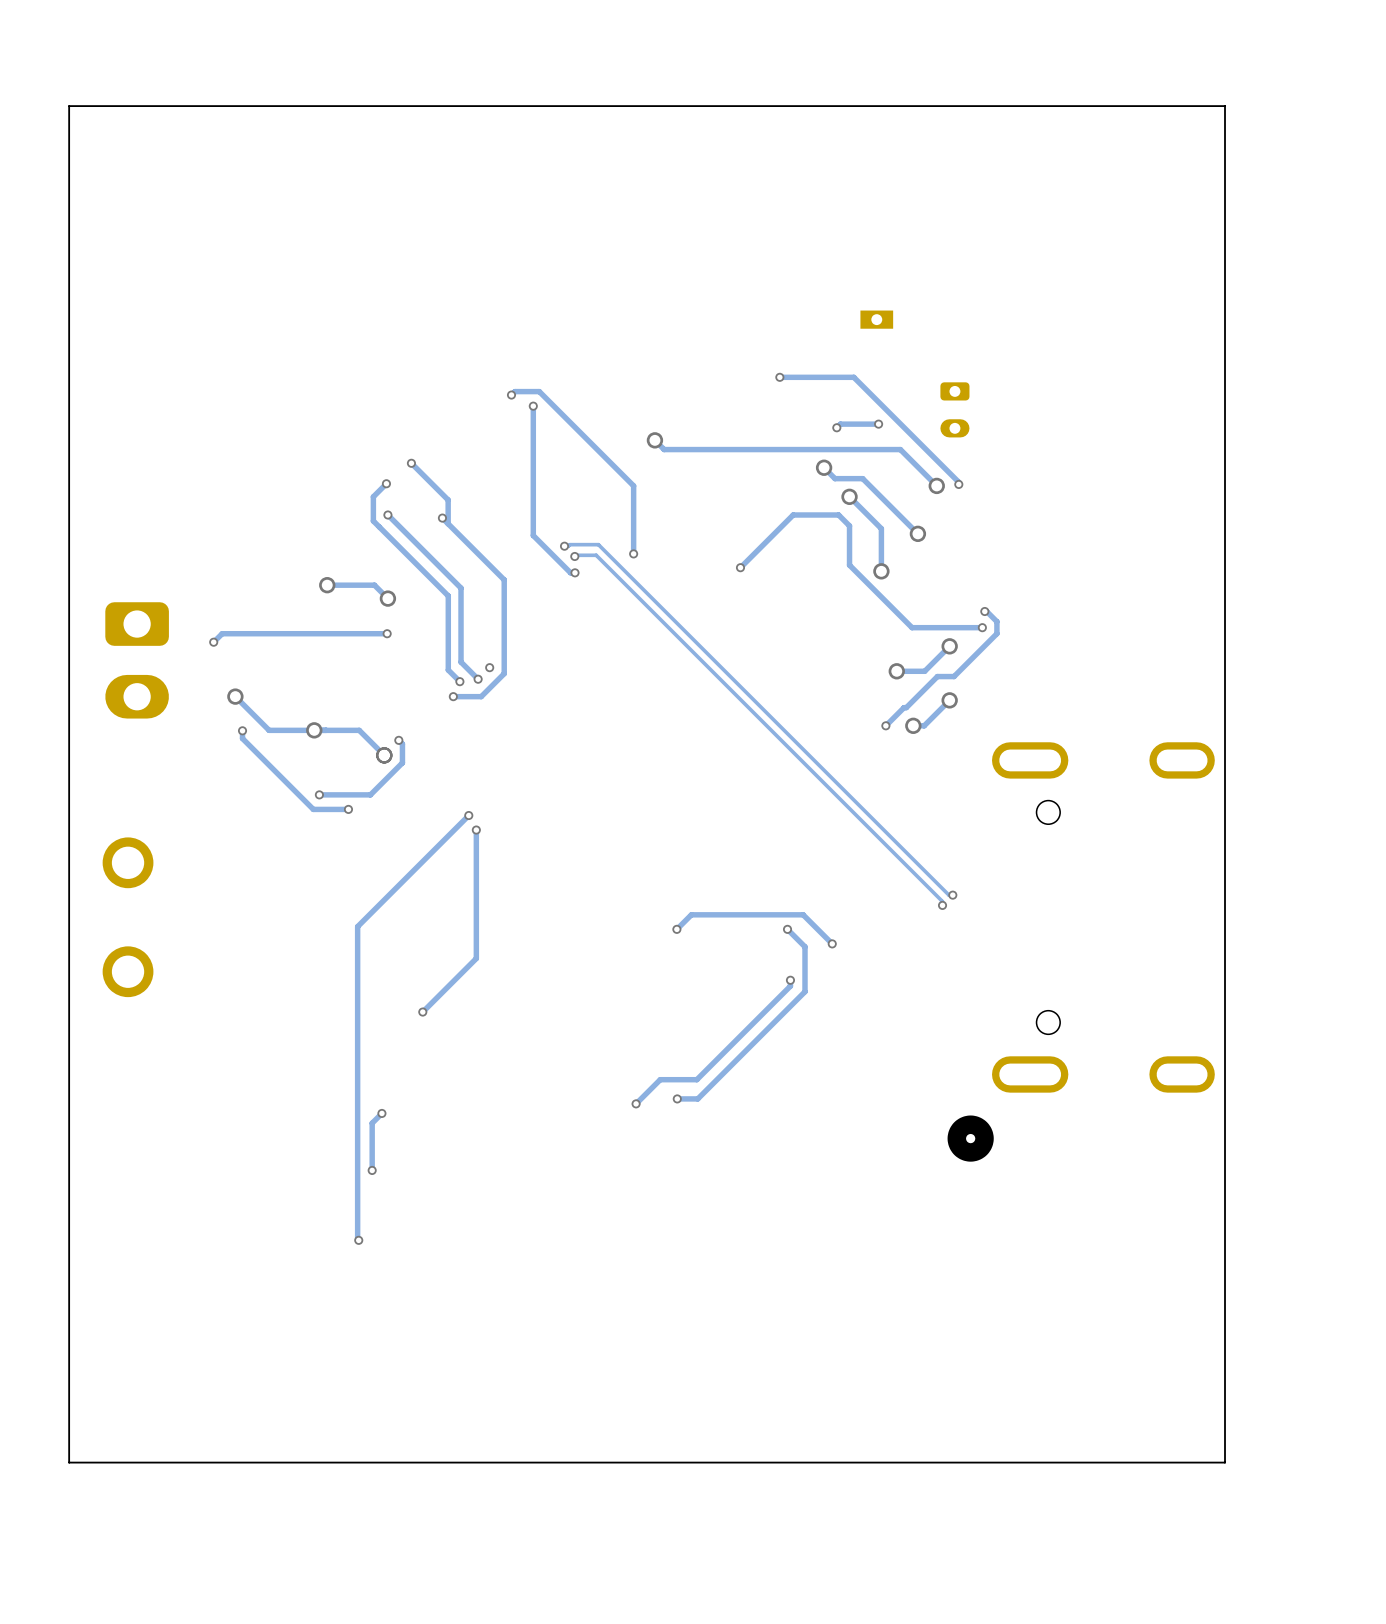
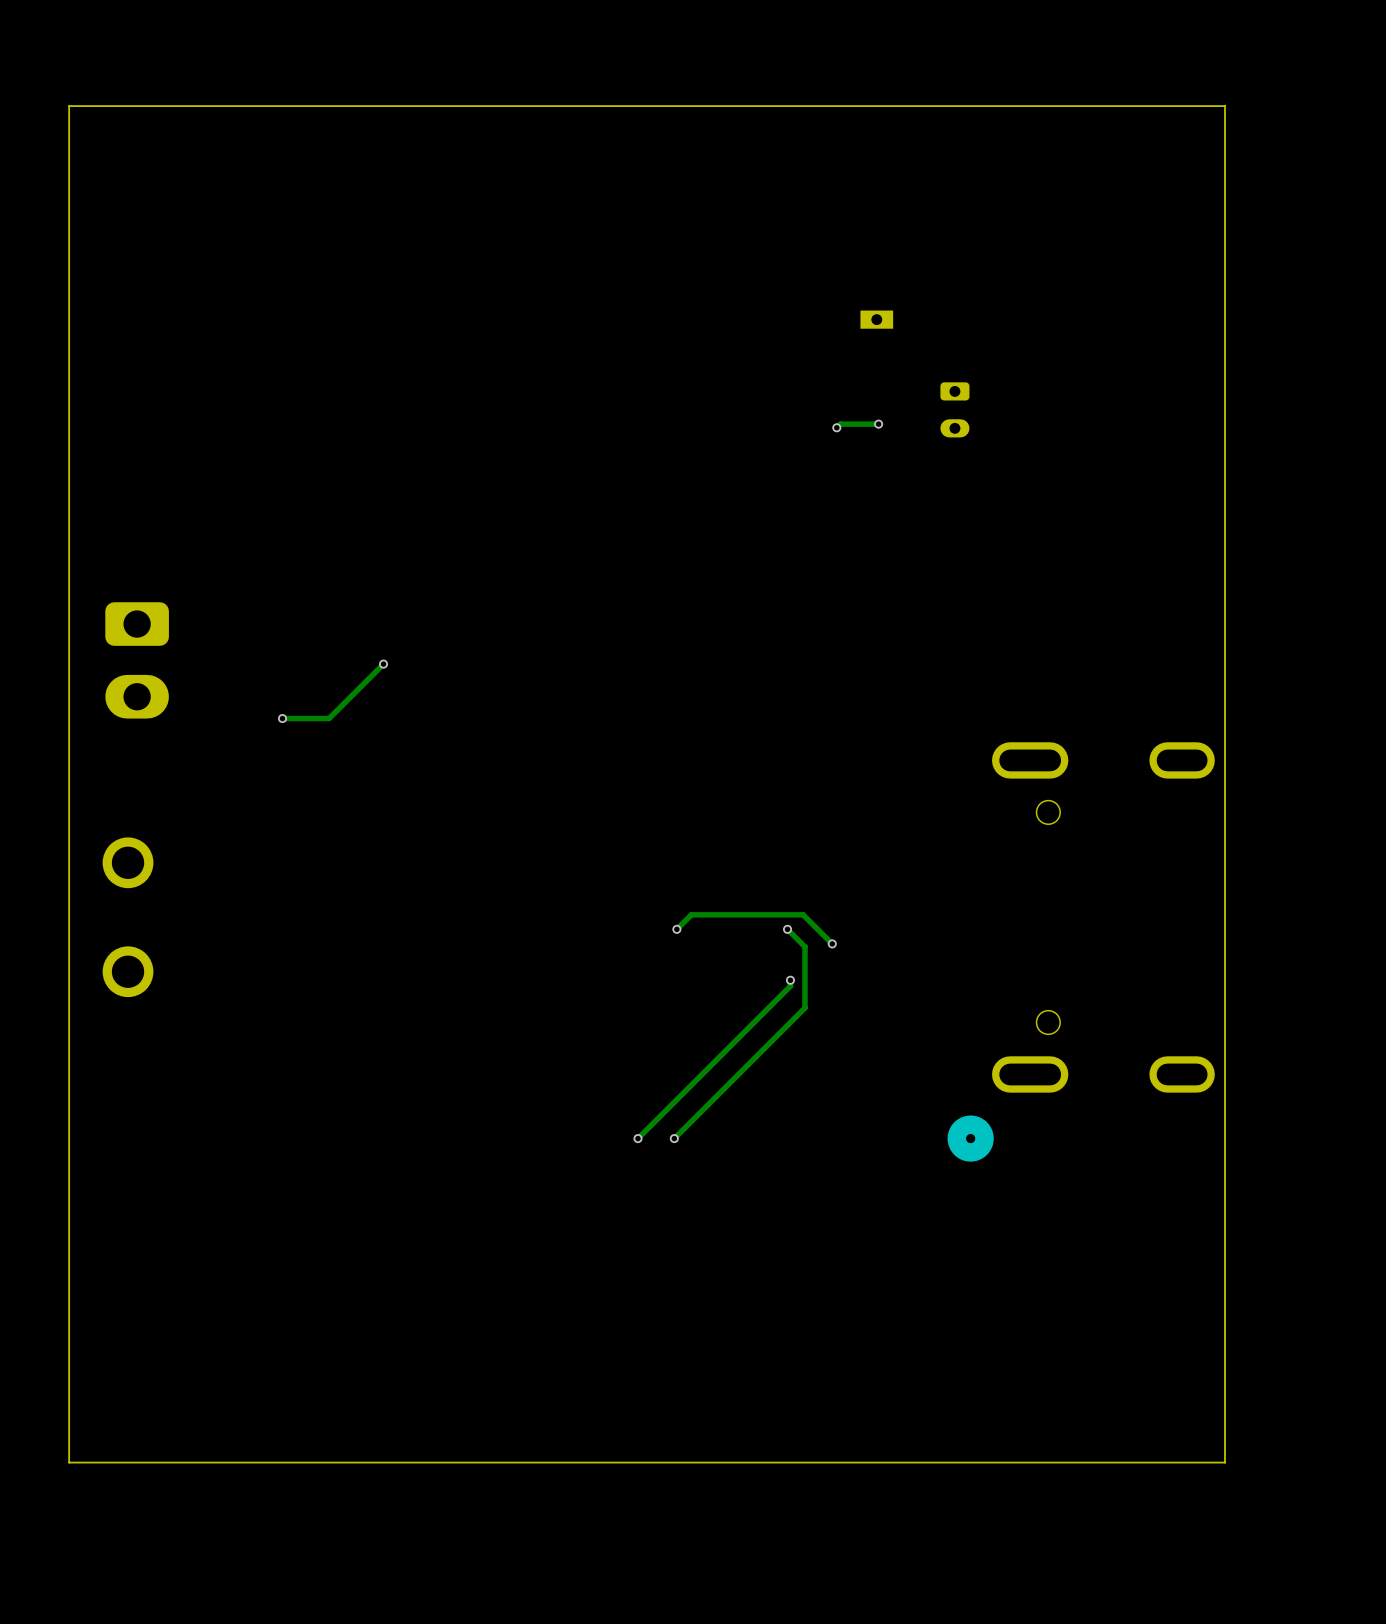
track: (779, 377) (853, 377) (958, 482) (958, 484) -> none
via: (779, 377) -> none
track: (511, 395) (514, 391) (539, 391) (633, 485) (633, 553) -> none
via: (511, 395) -> none
track: (533, 406) (533, 535) (570, 572) (575, 572) -> none
via: (533, 406) -> none
track: (654, 440) (664, 449) (900, 449) (936, 485) -> none
via: (654, 440) -> none
track: (411, 463) (448, 500) (448, 523) -> none
via: (411, 463) -> none
track: (824, 467) (834, 478) (862, 478) (917, 533) -> none
via: (824, 467) -> none
track: (386, 483) (373, 496) (373, 521) (448, 595) (448, 670) (459, 681) -> none
via: (386, 483) -> none
via: (958, 484) -> none
via: (936, 485) -> none
track: (849, 496) (881, 528) (881, 571) -> none
via: (849, 496) -> none
track: (387, 515) (461, 588) (461, 662) (478, 679) -> none
via: (387, 515) -> none
track: (442, 518) (504, 579) (504, 673) (481, 696) (453, 696) -> none
via: (442, 518) -> none
via: (917, 533) -> none
track: (564, 546) (598, 544) (948, 895) (952, 895) -> none
via: (564, 546) -> none
via: (633, 553) -> none
track: (574, 556) (596, 555) (942, 901) (942, 905) -> none
via: (574, 556) -> none
track: (740, 567) (793, 515) (838, 515) (849, 525) (849, 565) (912, 627) (982, 627) -> none
via: (740, 567) -> none
via: (881, 571) -> none
via: (575, 572) -> none
track: (327, 585) (374, 585) (387, 598) -> none
via: (327, 585) -> none
via: (387, 598) -> none
track: (984, 611) (996, 621) (996, 633) (954, 676) (937, 676) (885, 725) -> none
via: (984, 611) -> none
via: (982, 627) -> none
track: (387, 633) (222, 633) (213, 642) -> none
via position: (387, 633) -> (383, 664)
via: (213, 642) -> none
track: (949, 646) (924, 671) (896, 671) -> none
via: (949, 646) -> none
track: none -> (383, 664) (329, 718) (282, 718)
via: (489, 667) -> none
via: (896, 671) -> none
via: (478, 679) -> none
via: (459, 681) -> none
track: (235, 696) (269, 730) (359, 730) (384, 755) -> none
via: (235, 696) -> none
via: (453, 696) -> none
track: (949, 700) (924, 725) (913, 725) -> none
via: (949, 700) -> none
via: (885, 725) -> none
via: (913, 725) -> none
track: (242, 730) (242, 738) (313, 809) (348, 809) -> none
via position: (242, 730) -> (282, 718)
via: (314, 730) -> none
track: (398, 740) (402, 743) (402, 762) (370, 794) (319, 794) -> none
via: (398, 740) -> none
via: (384, 755) -> none
via: (319, 794) -> none
via: (348, 809) -> none
track: (468, 815) (357, 926) (358, 1240) -> none
via: (468, 815) -> none
track: (476, 830) (476, 958) (422, 1012) -> none
via: (476, 830) -> none
via: (952, 895) -> none
via: (942, 905) -> none
track: (805, 991) (697, 1098) (677, 1098) -> (805, 991) (805, 1007) (674, 1138)
via: (422, 1012) -> none
track: (696, 1079) (660, 1079) (636, 1103) -> (696, 1079) (637, 1138)
via: (677, 1098) -> none
via: (636, 1103) -> none
track: (381, 1113) (372, 1123) (372, 1171) -> none
via: (381, 1113) -> none
via: none -> (637, 1138)
via: none -> (674, 1138)
via: (372, 1170) -> none
via: (358, 1240) -> none

